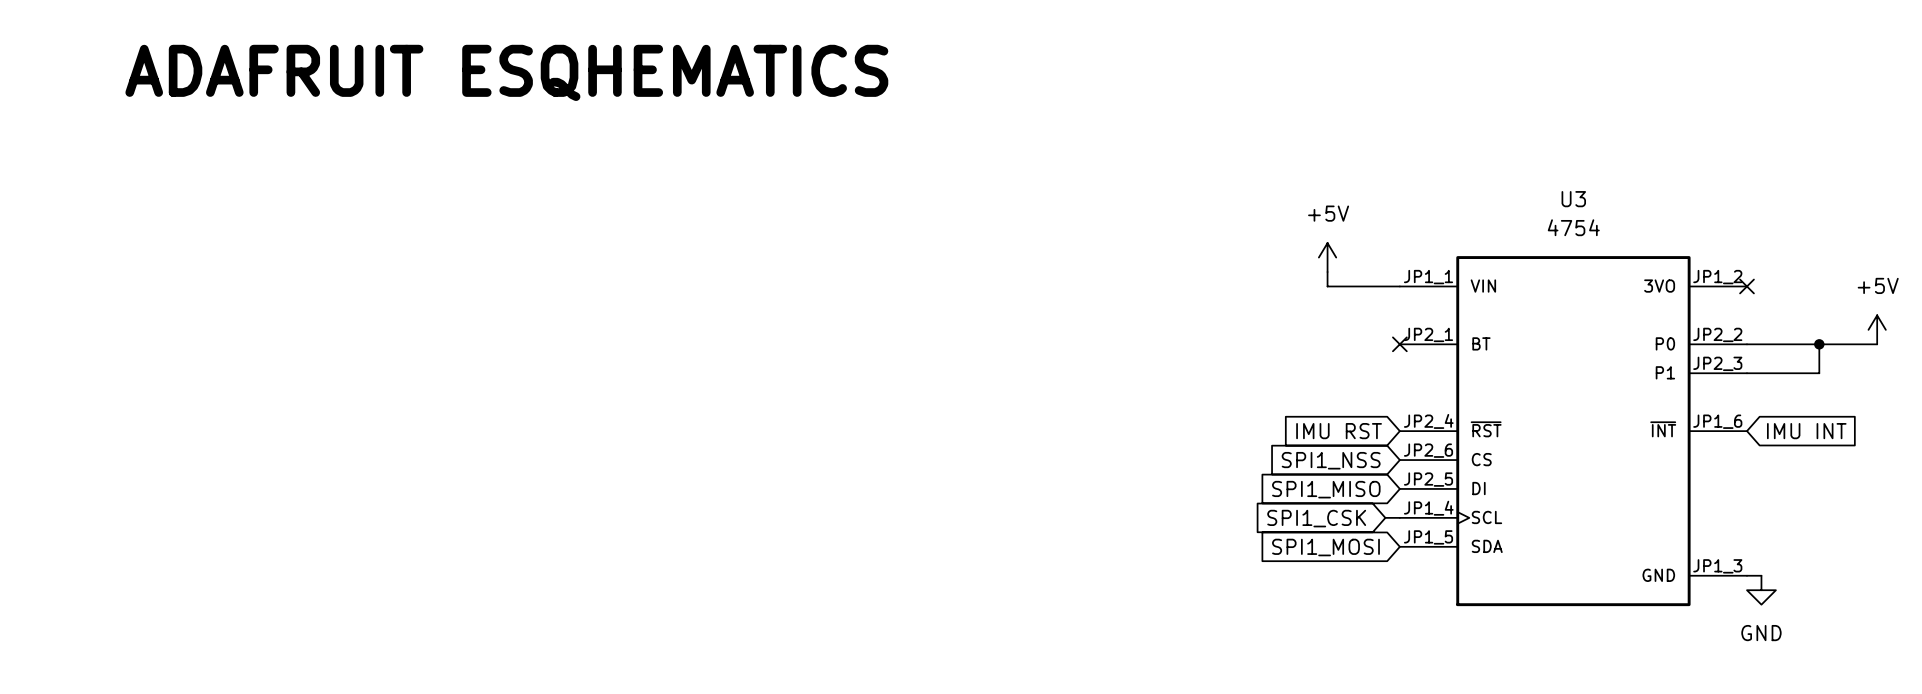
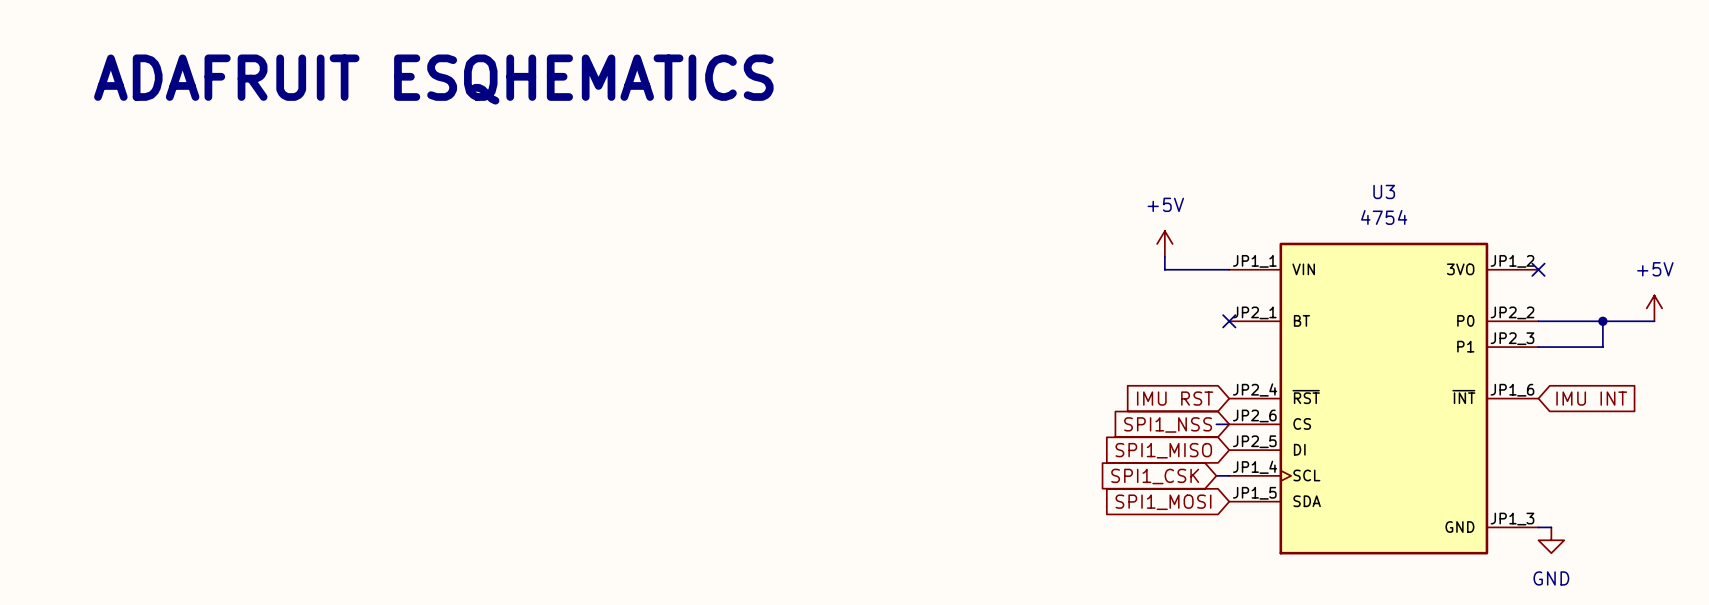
wire: none -> (1216, 424) (1229, 424)

